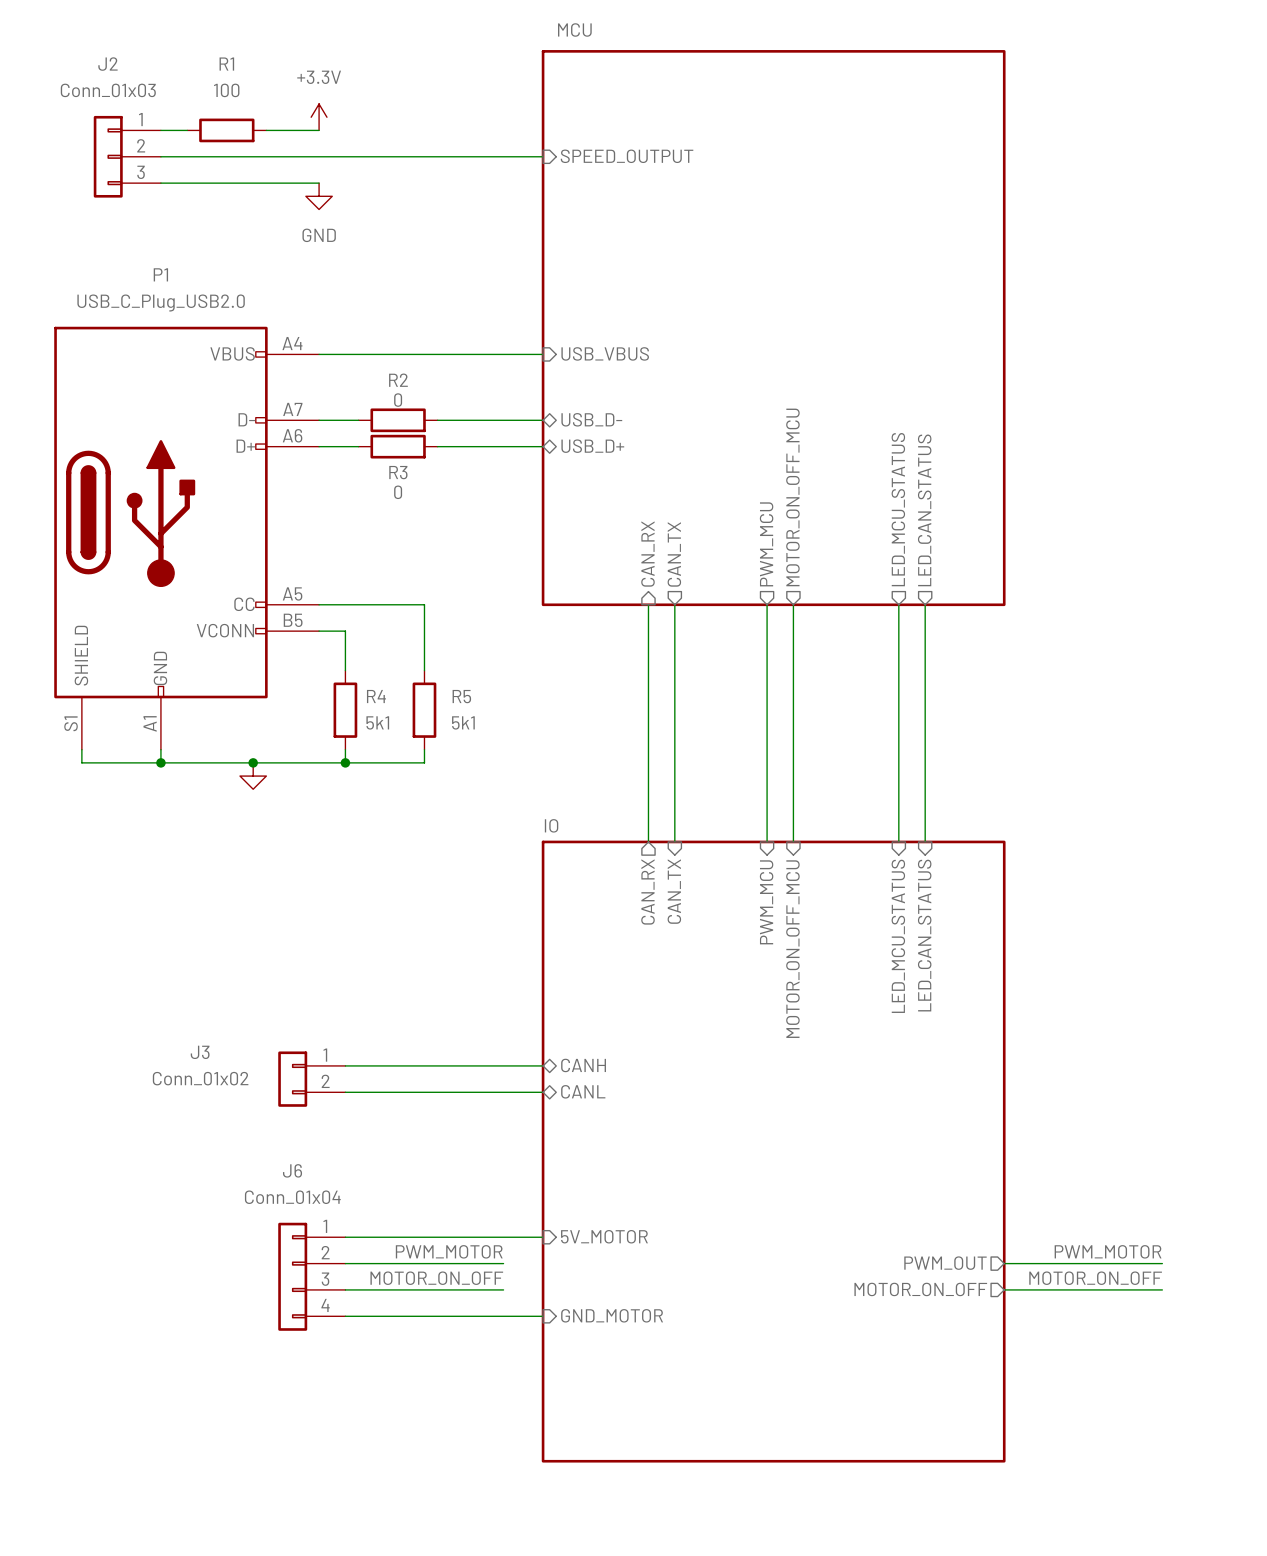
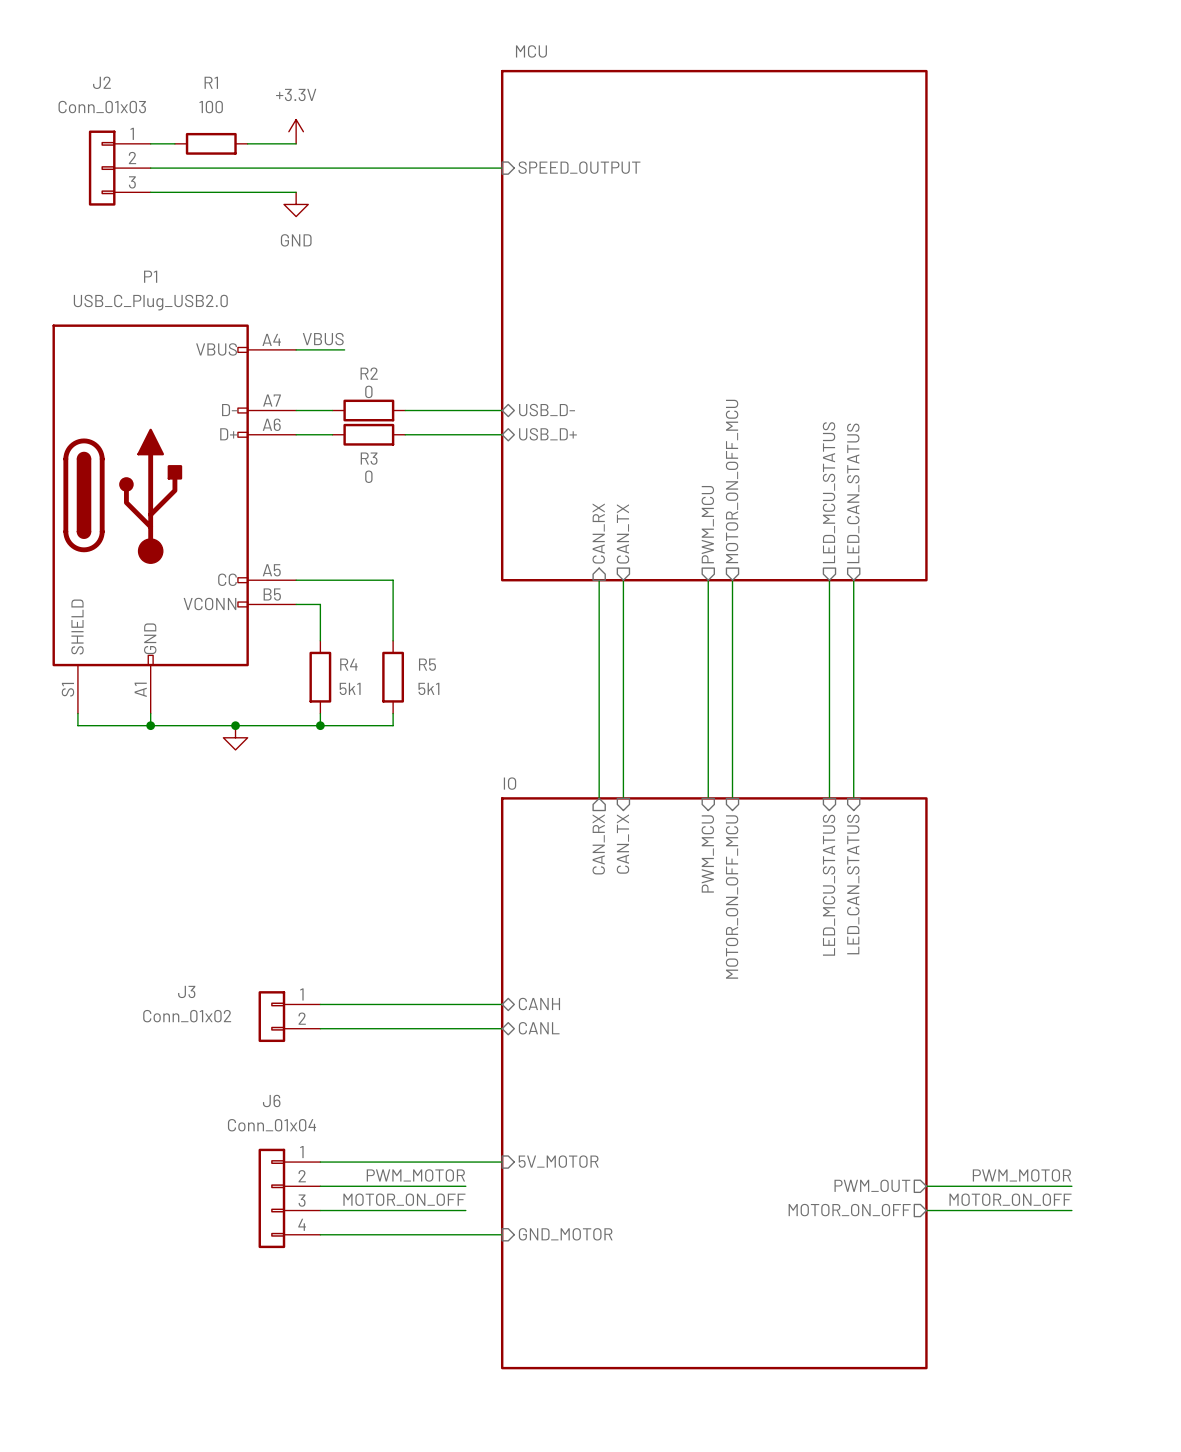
label: none -> VBUS (323, 339)
sheet pin: USB_VBUS (605, 353) -> none
wire: (371, 354) (543, 354) -> none

